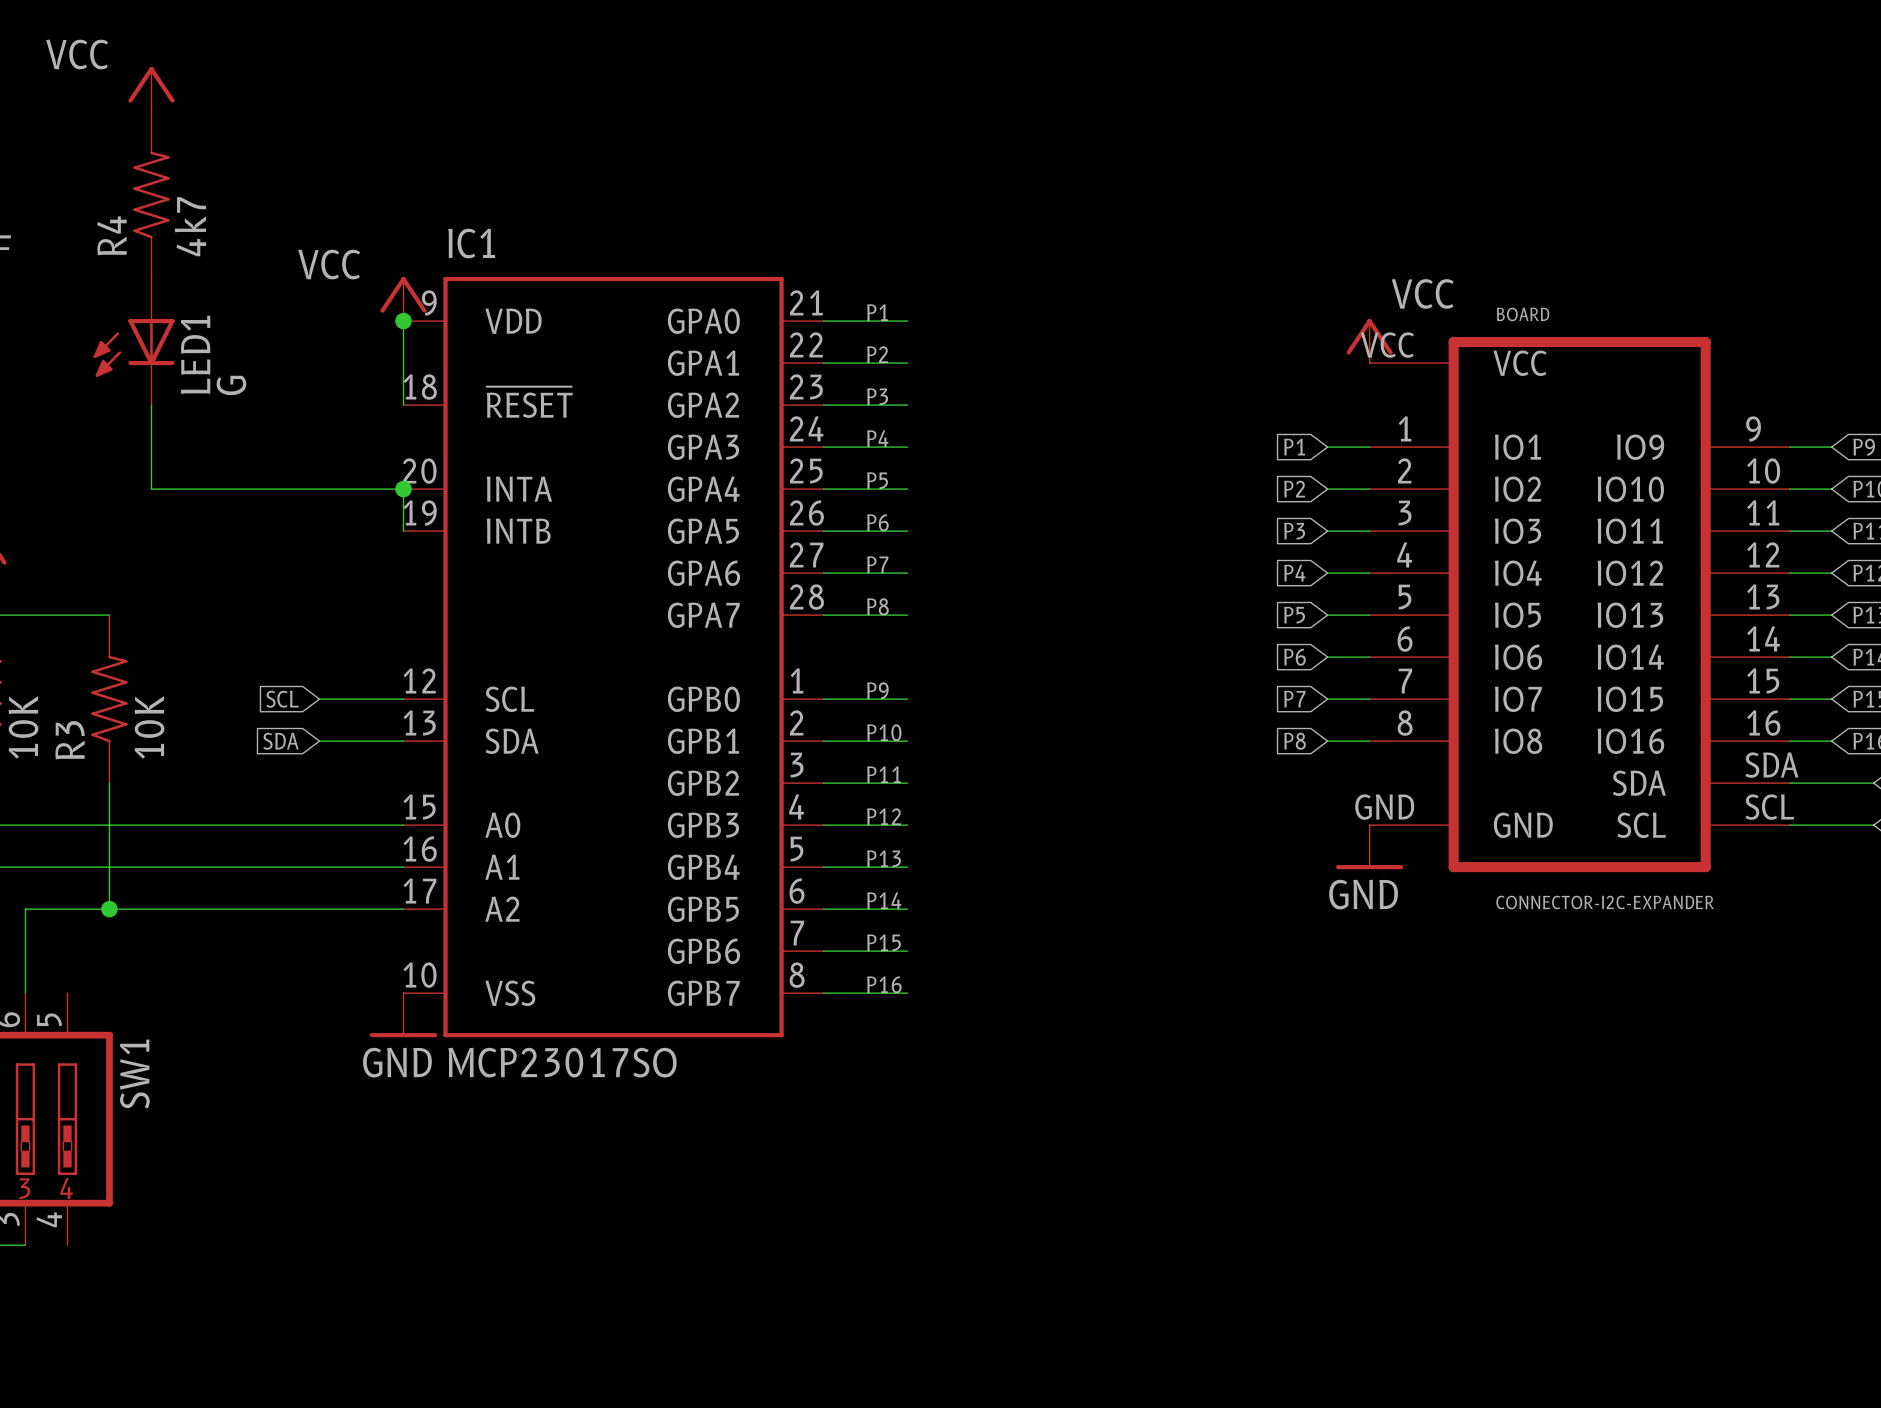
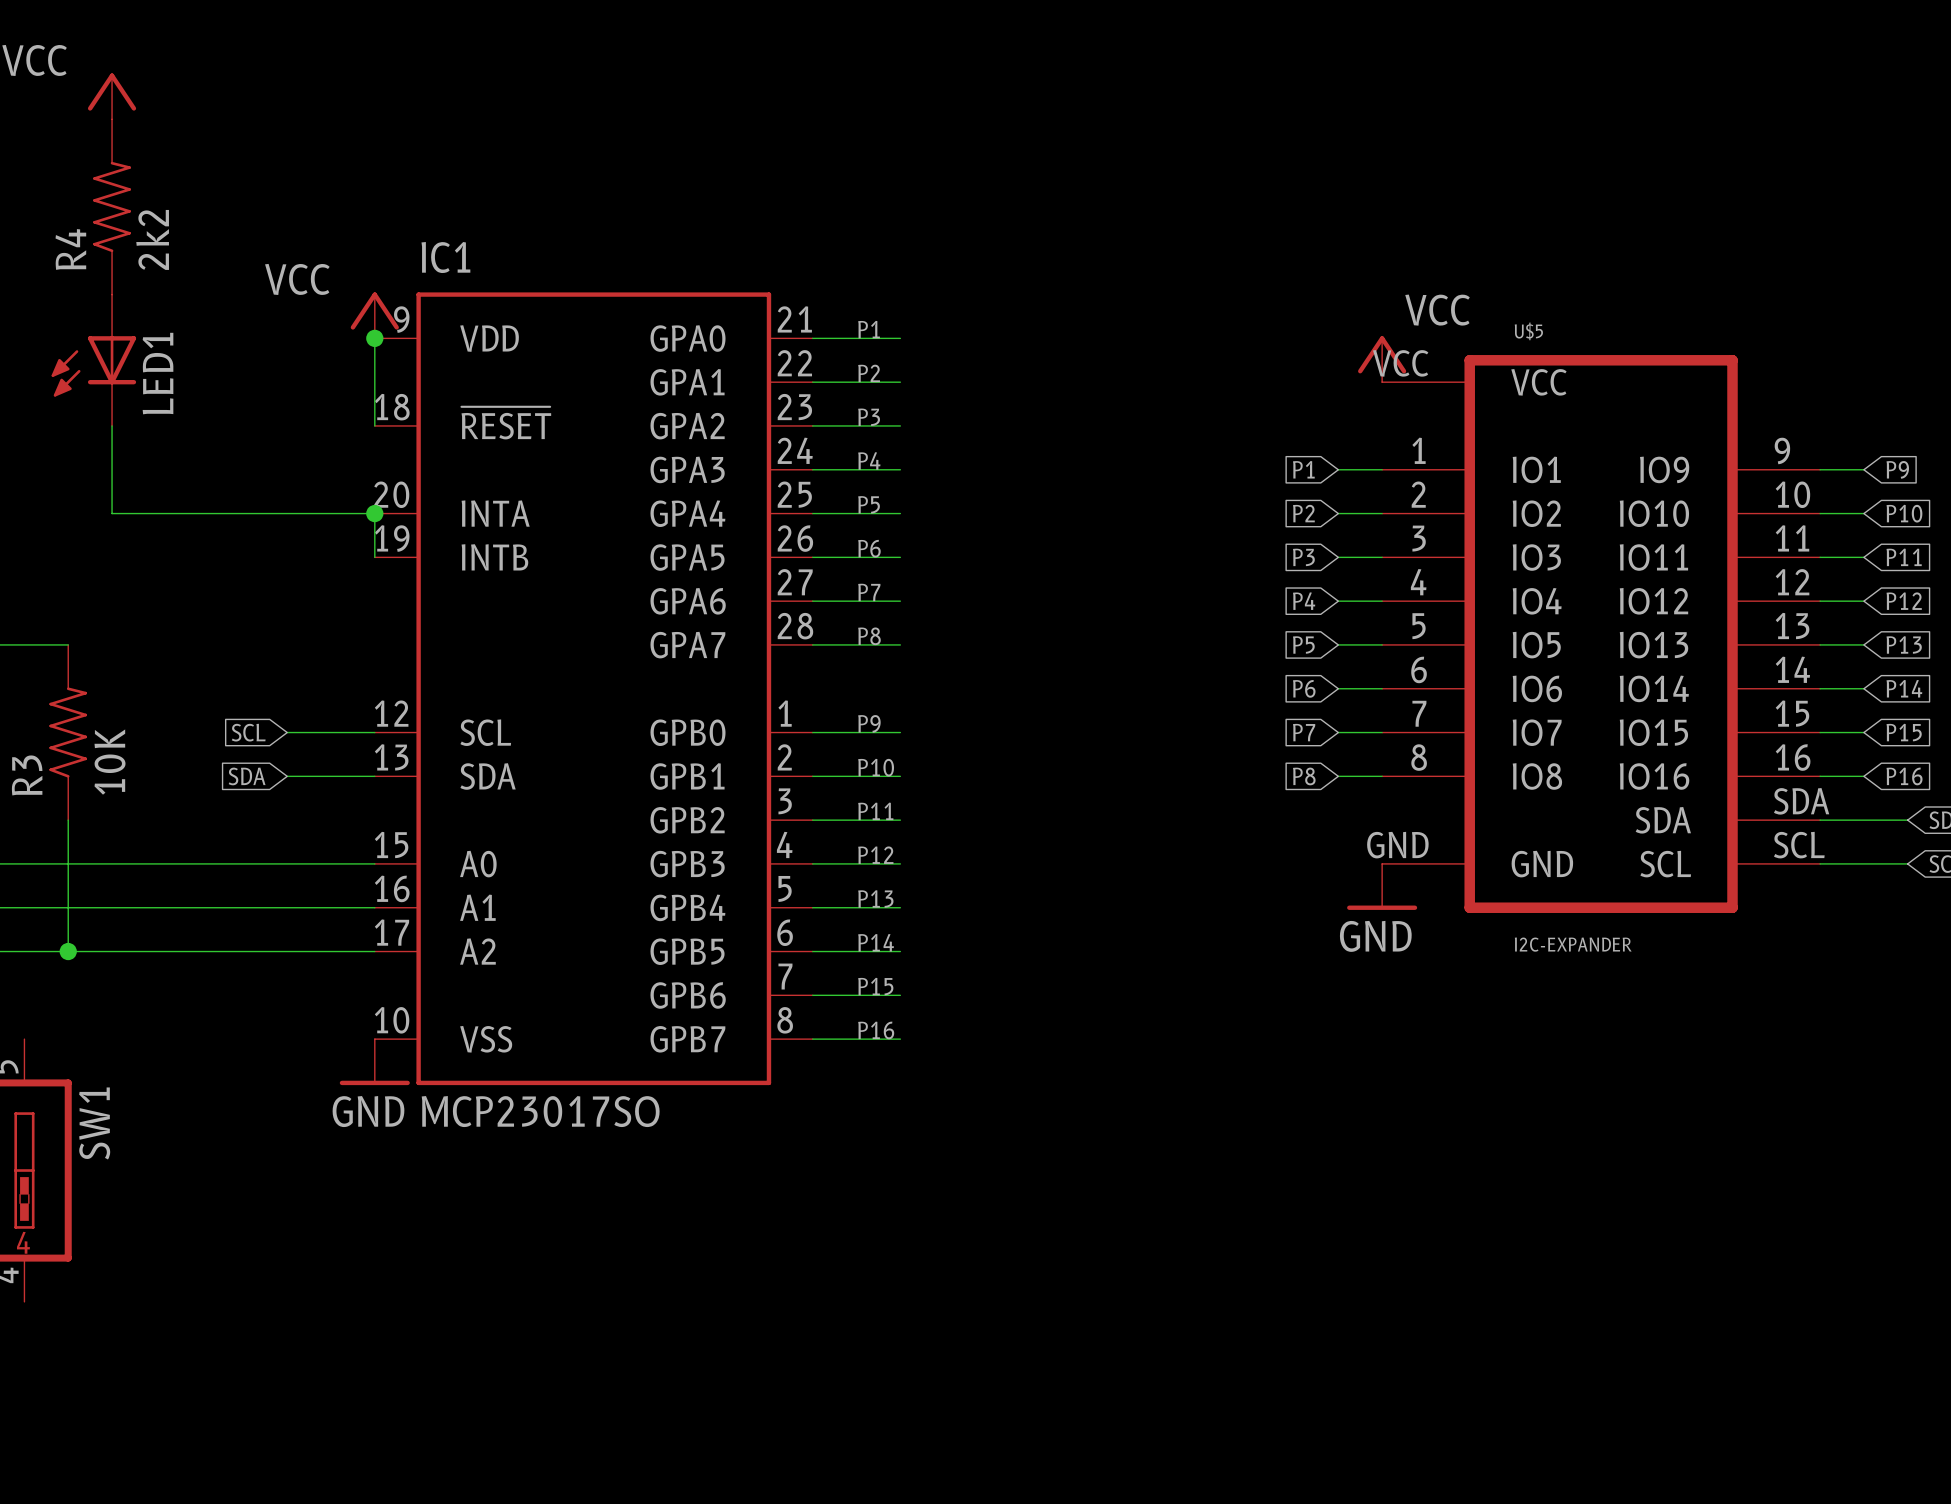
R4 value: 4k7 (190, 226) -> 2k2 (152, 239)
BOARD name: BOARD (1523, 314) -> U$5 (1528, 331)
LED1 value: G (231, 385) -> none
BOARD value: CONNECTOR-I2C-EXPANDER (1605, 902) -> I2C-EXPANDER (1573, 944)

